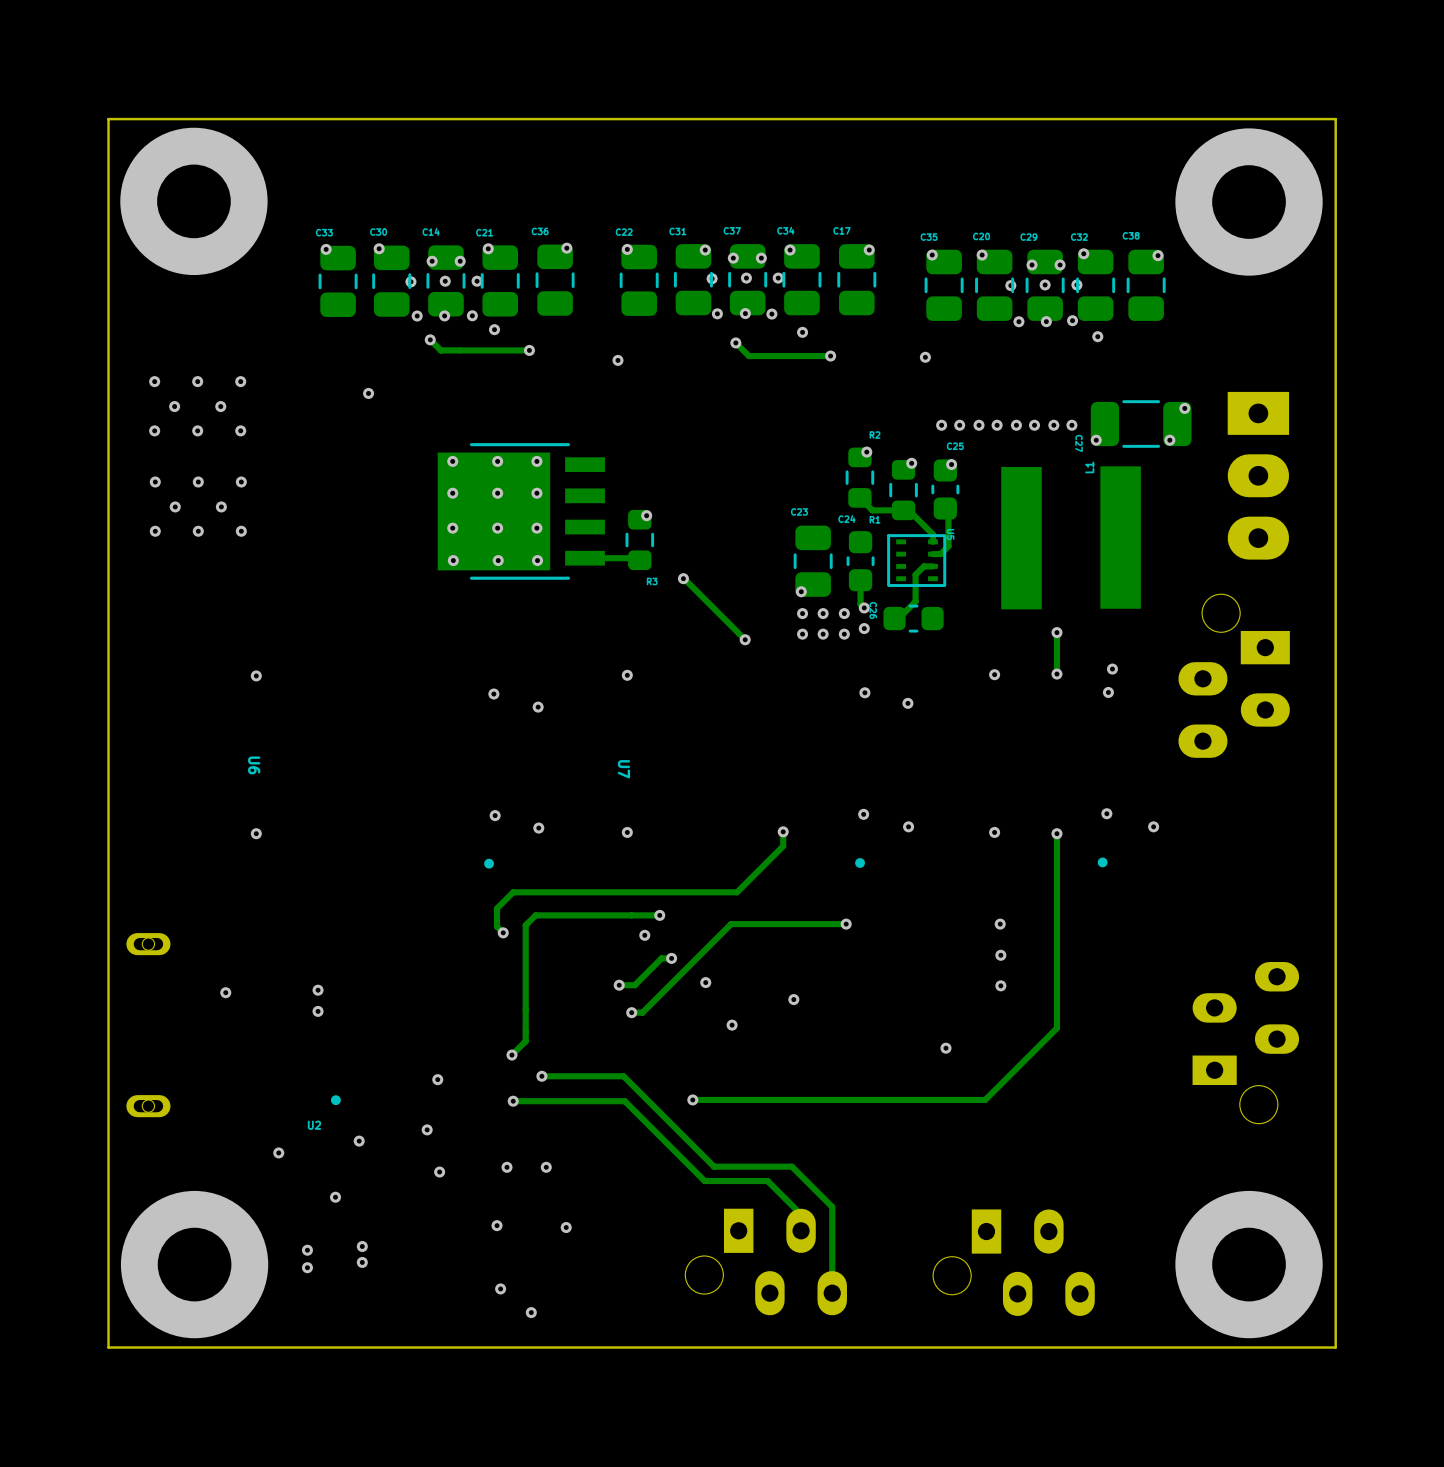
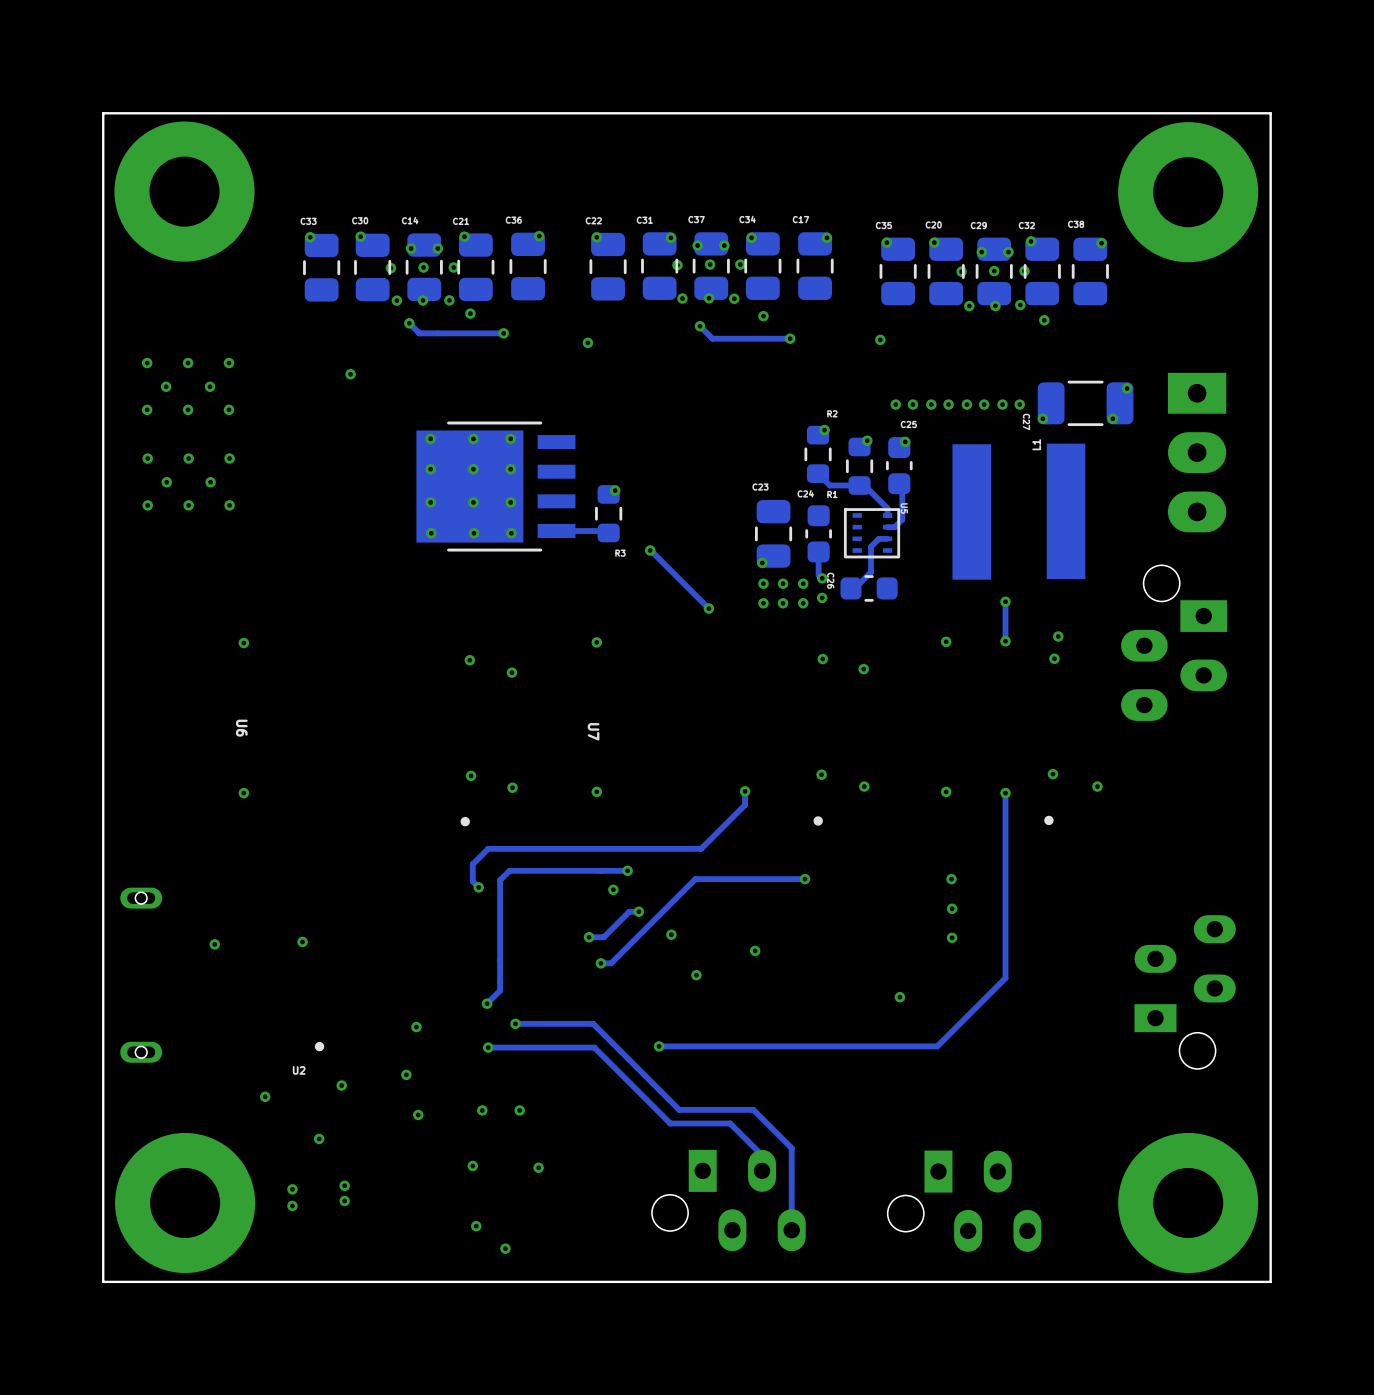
via: (318, 1011) -> none

